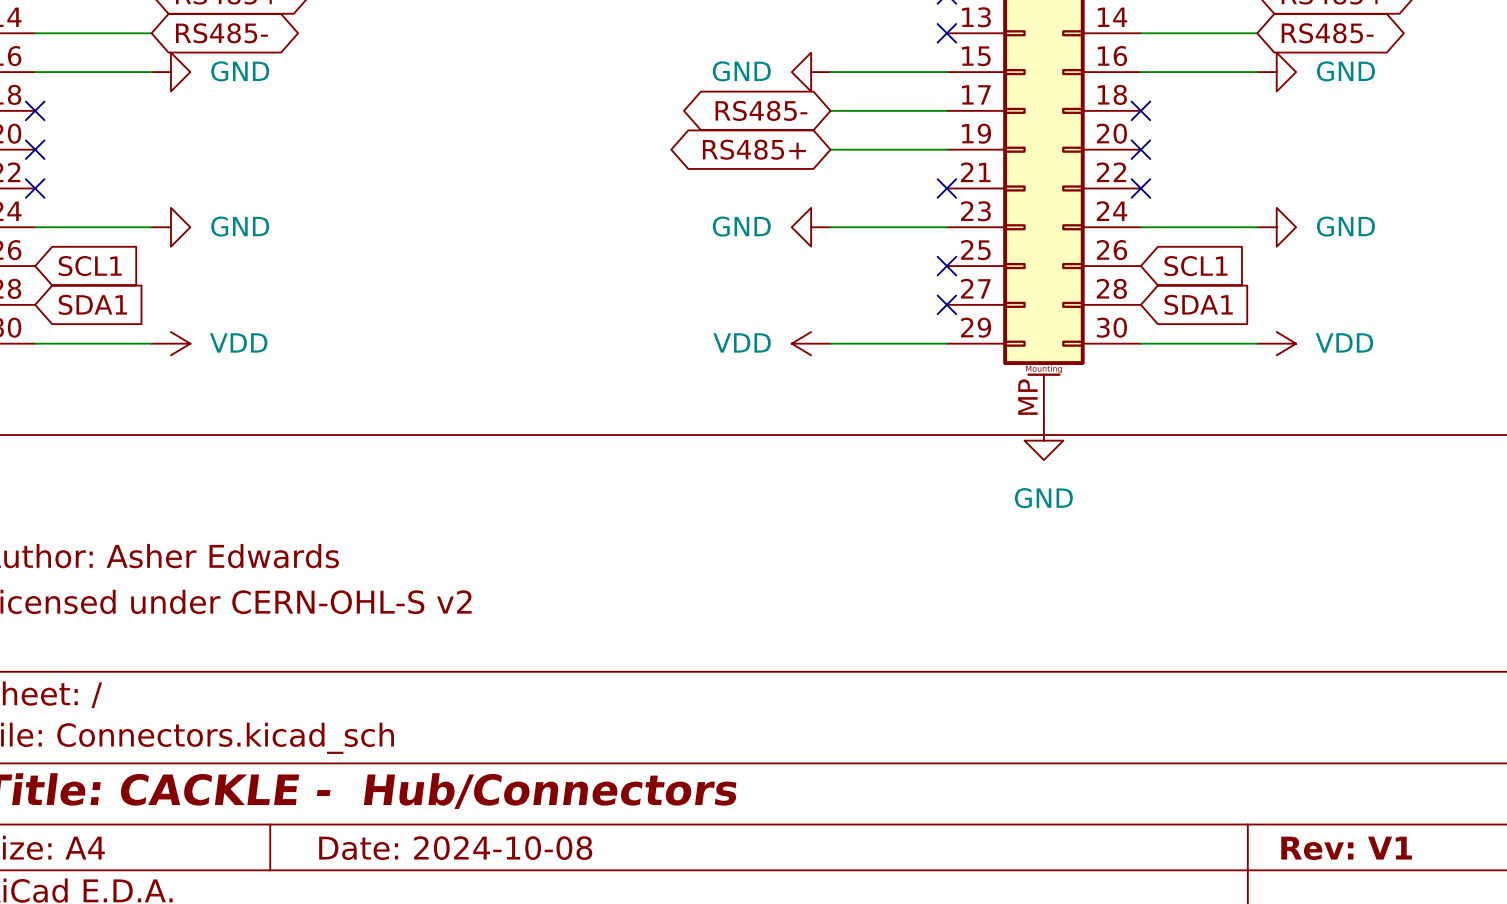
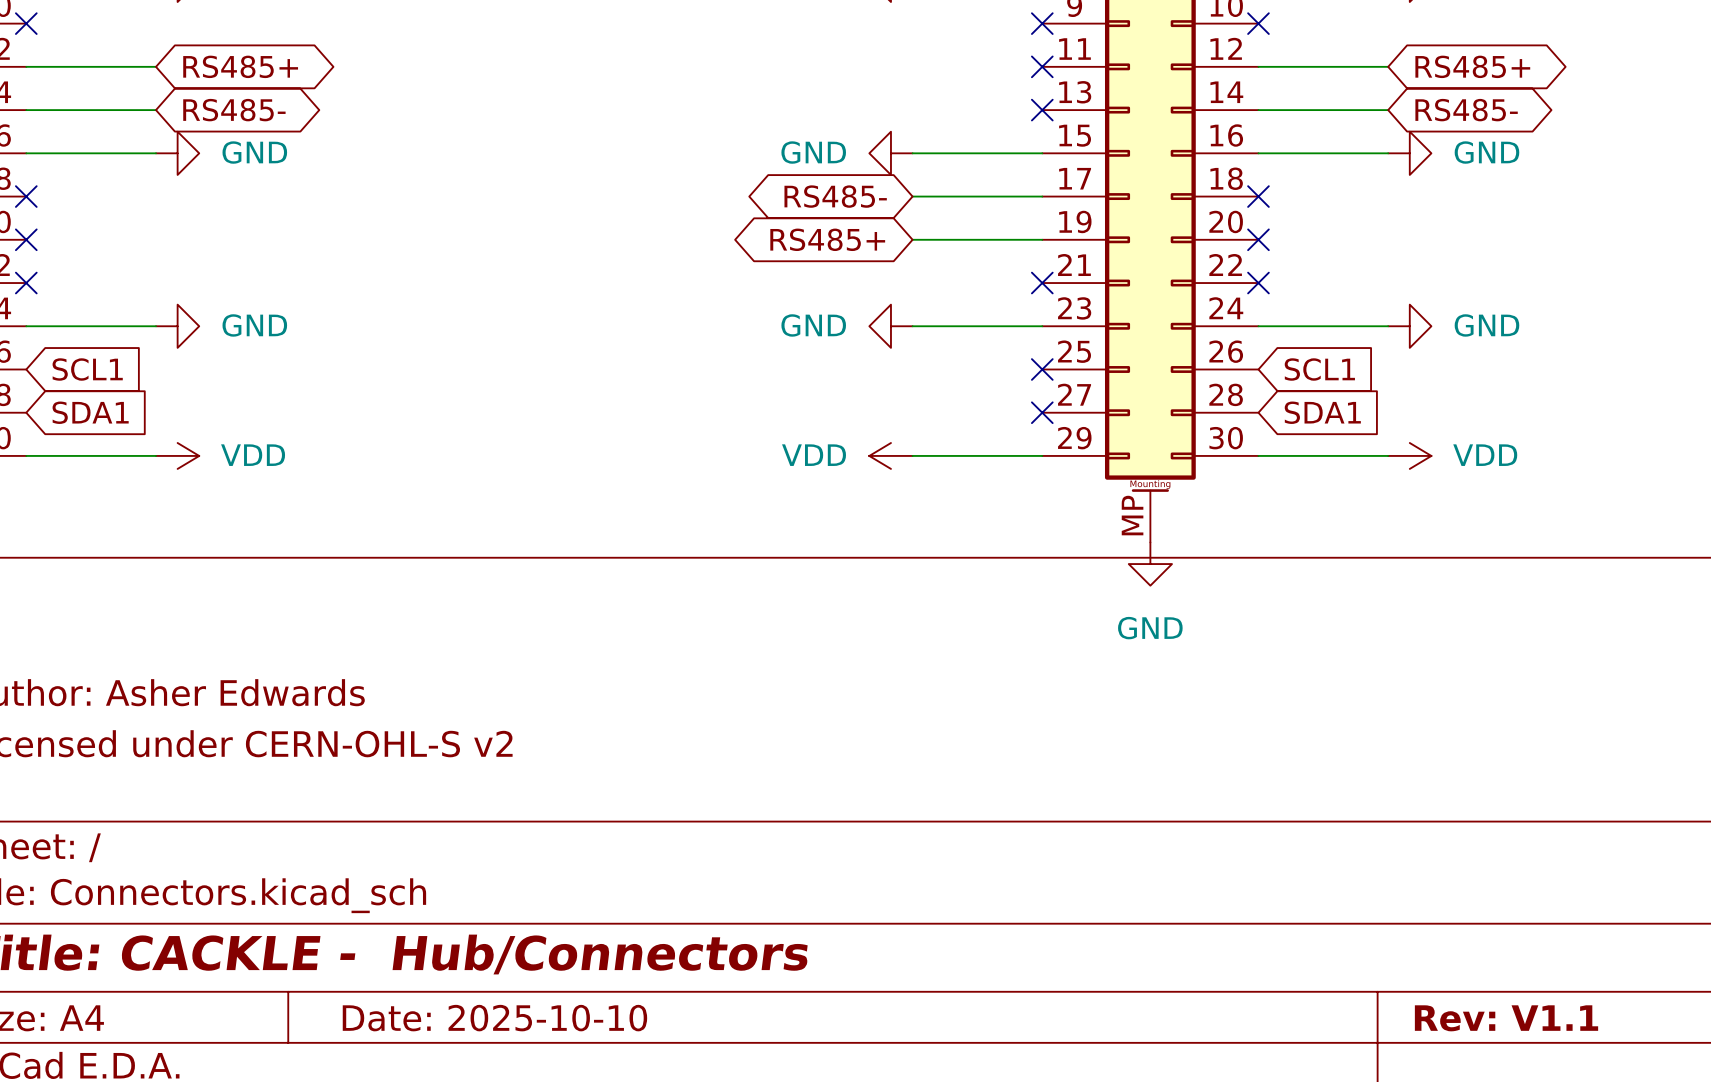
title block: Date: 2024-10-08 (455, 848) -> Date: 2025-10-10 (494, 1018)
title block: Rev: V1 (1346, 848) -> Rev: V1.1 (1506, 1018)

